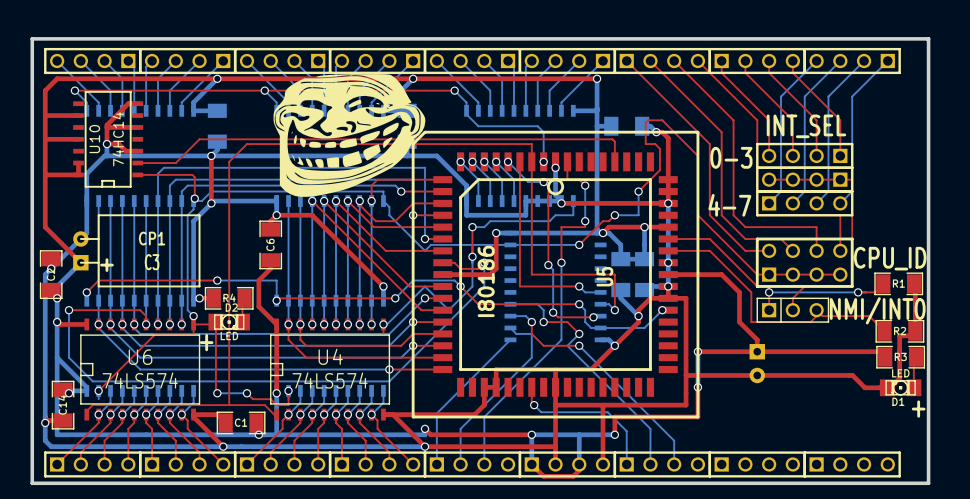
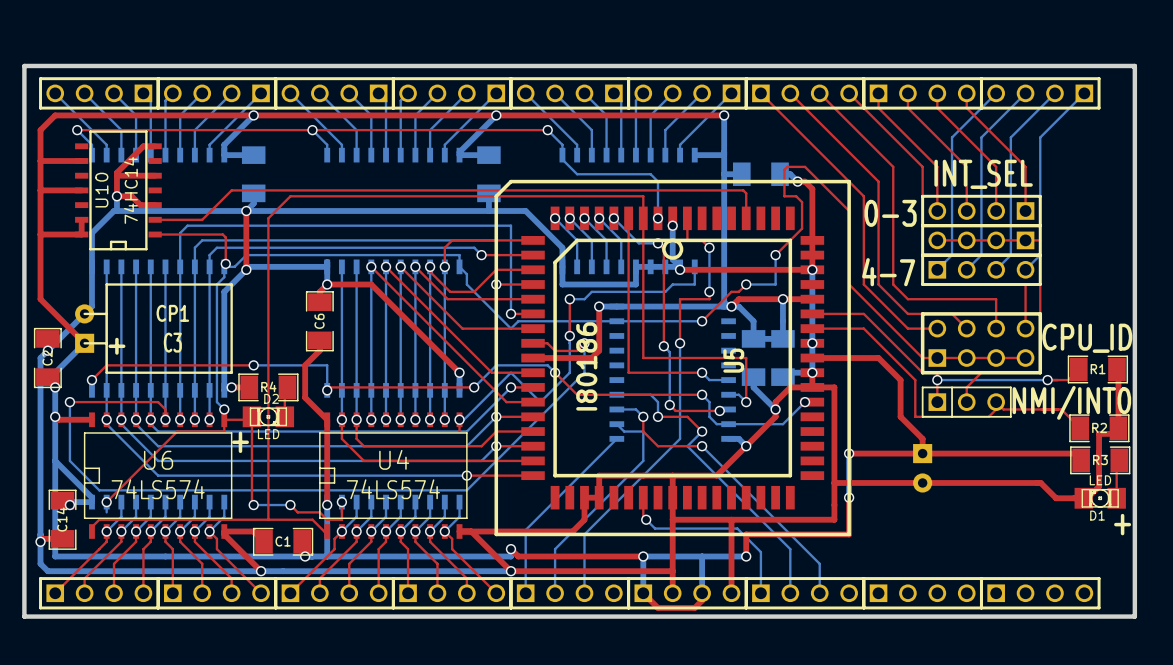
drawing: [273, 74, 426, 197] -> none

